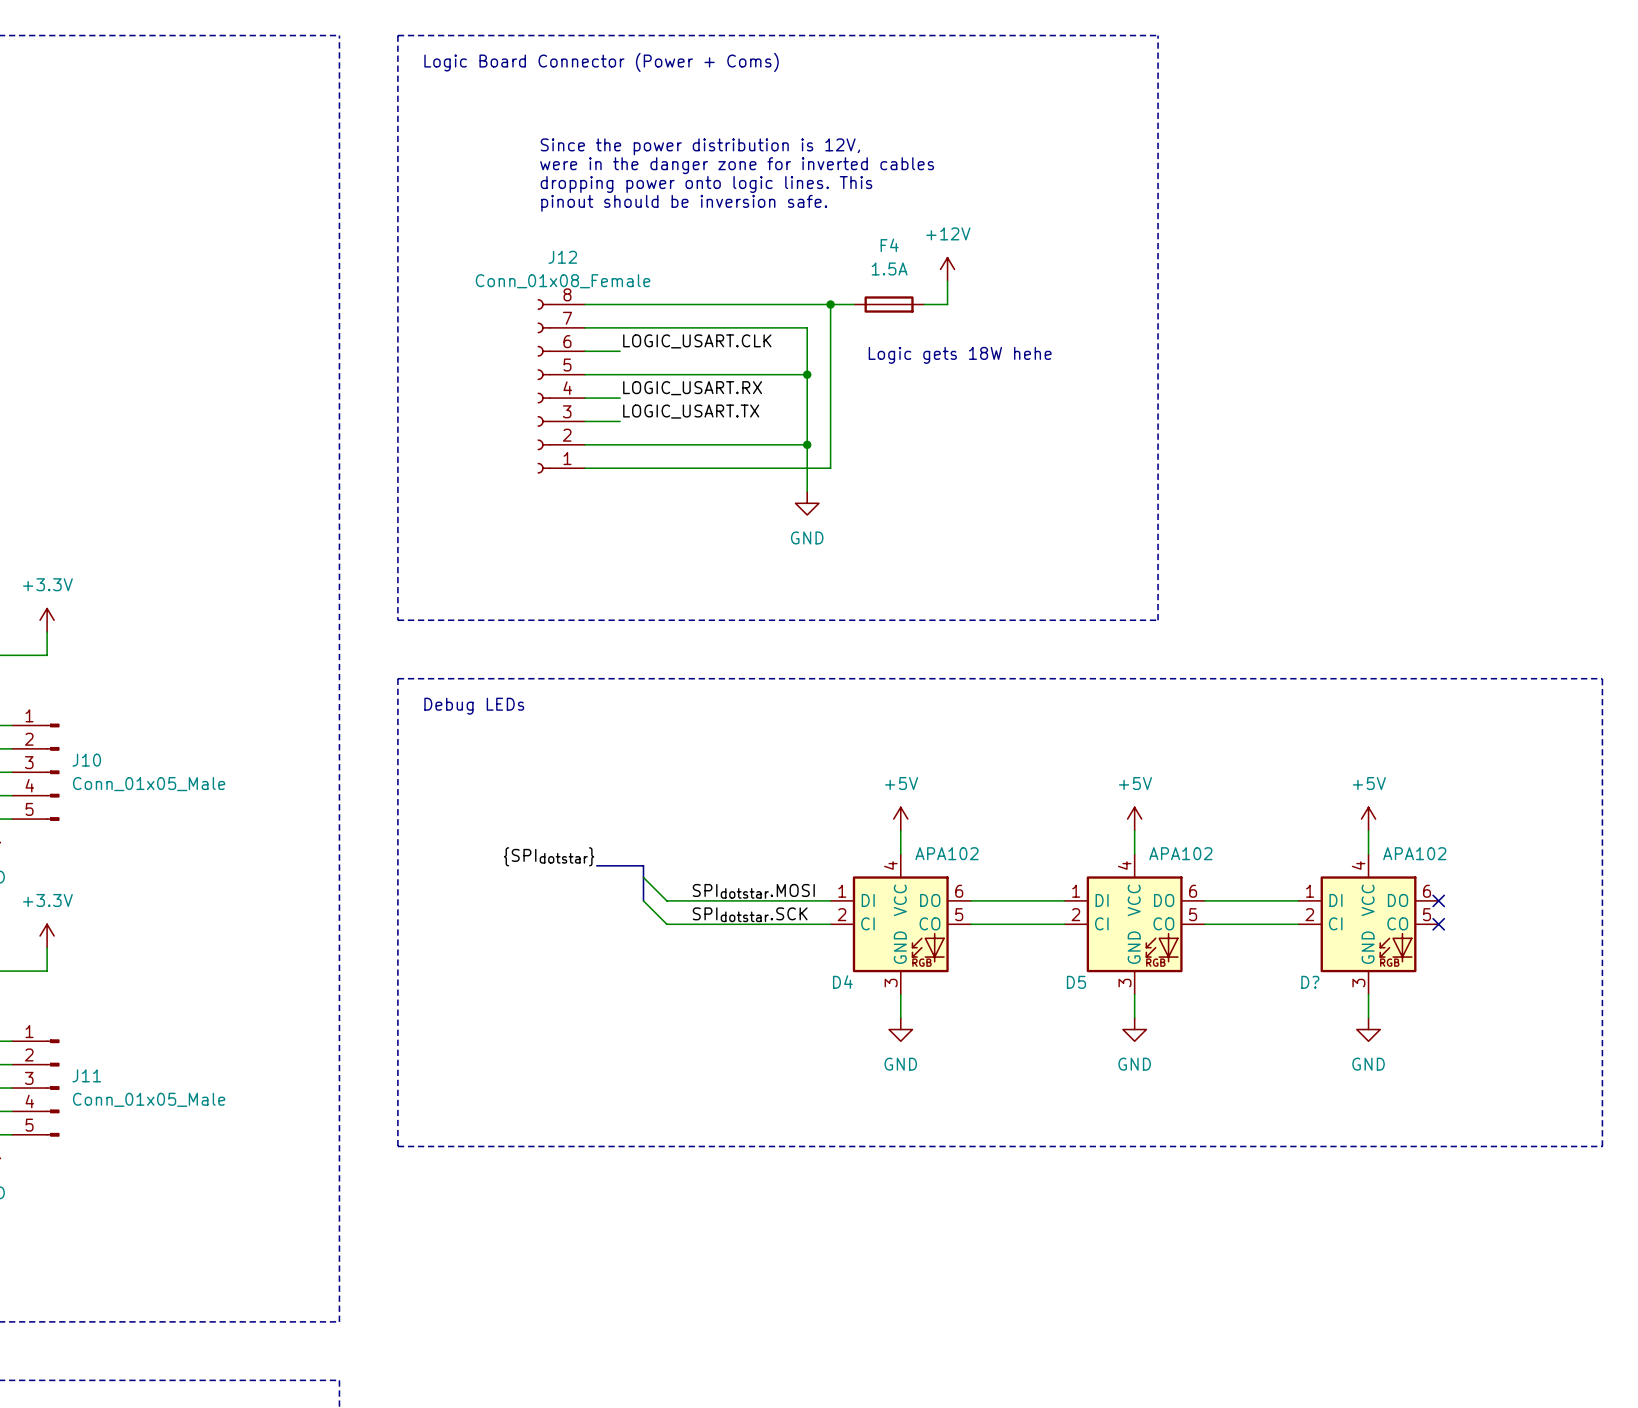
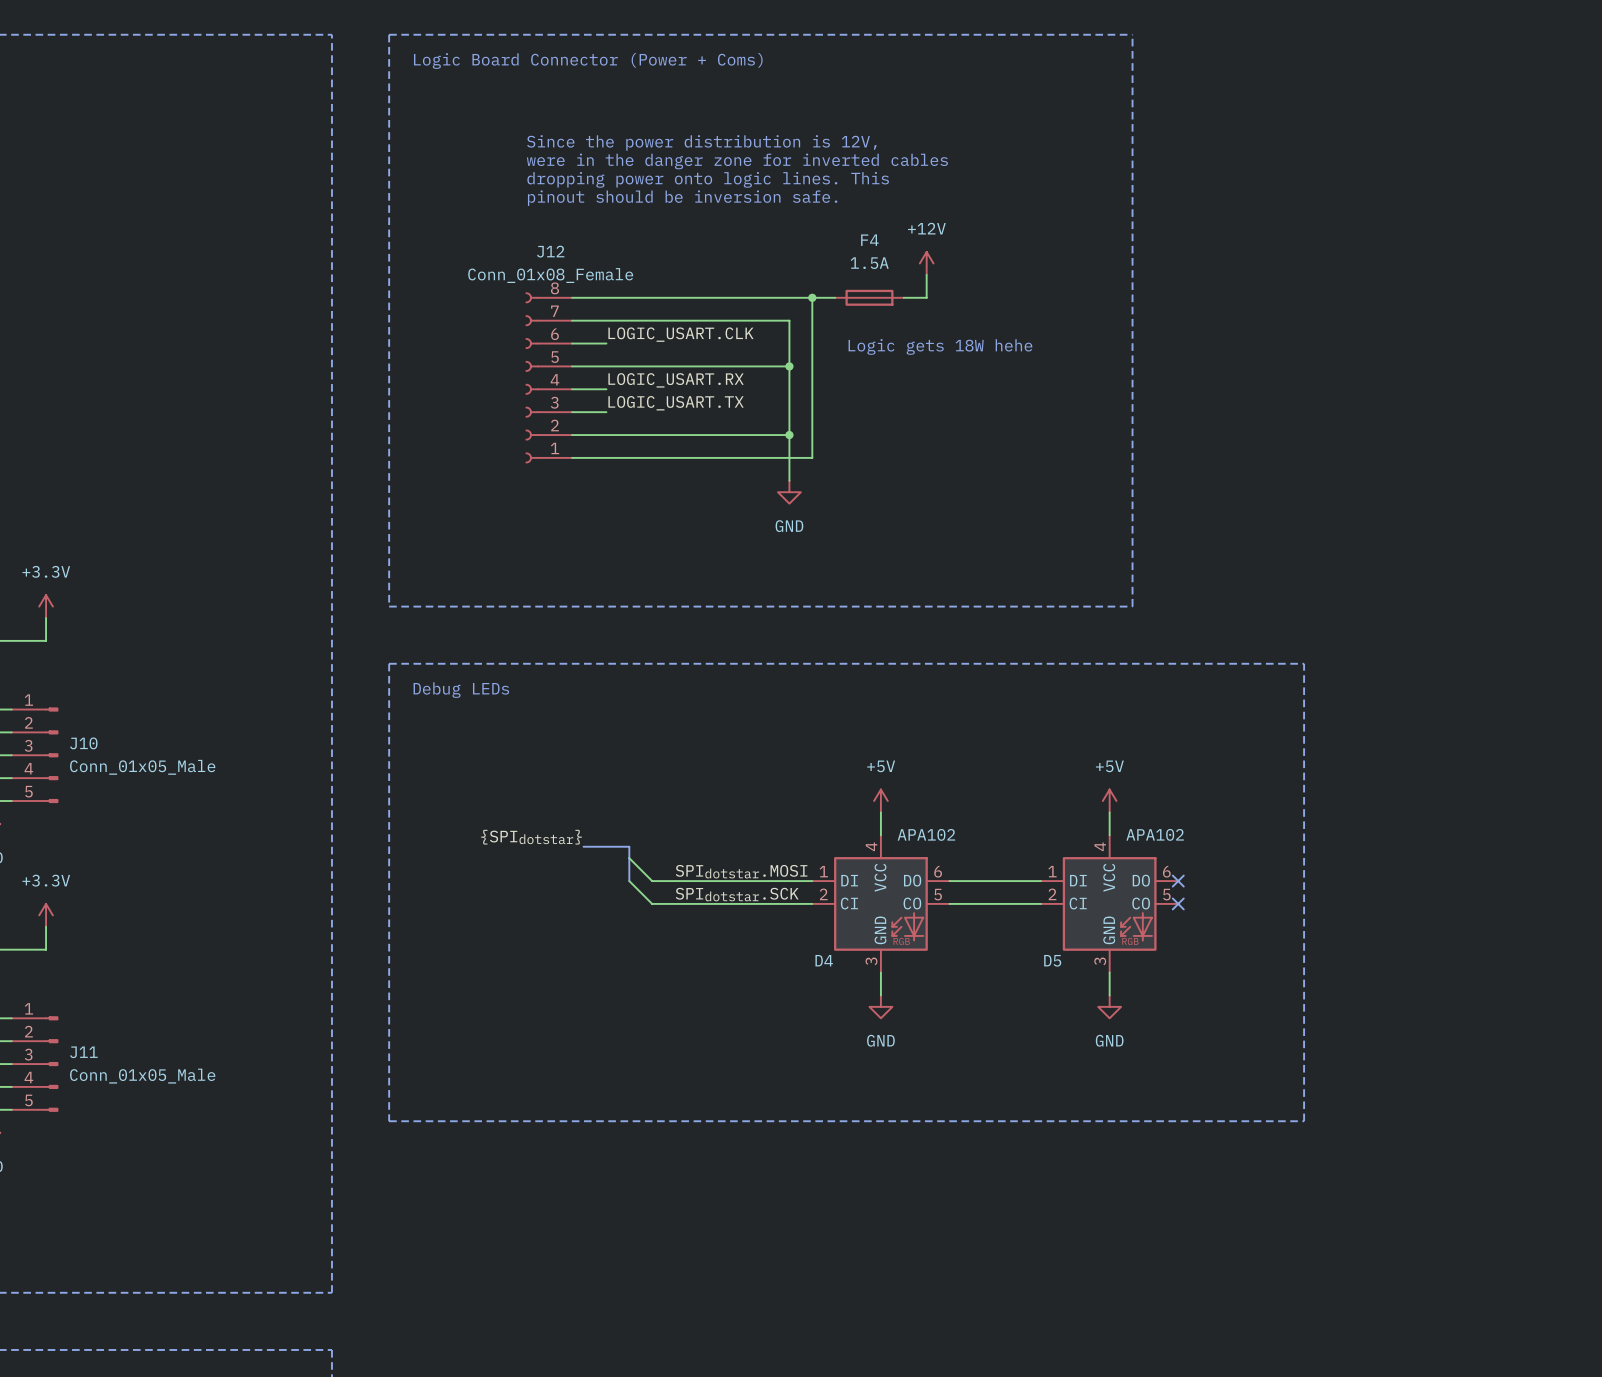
line: (1333, 678) (1602, 678) (1602, 1146) (1333, 1146) -> (1304, 663) (1304, 1121)
power symbol: +5V (1368, 819) -> none
wire: (1368, 830) (1368, 854) -> none
wire: (1204, 900) (1298, 900) -> none
no-connect mark: none -> (1178, 881)
no-connect mark: (1438, 900) -> none
wire: (1204, 924) (1298, 924) -> none
no-connect mark: none -> (1178, 903)
D?: APA102 (1368, 924) -> none
no-connect mark: (1438, 924) -> none
wire: (1368, 994) (1368, 1017) -> none
power symbol: GND (1368, 1029) -> none

